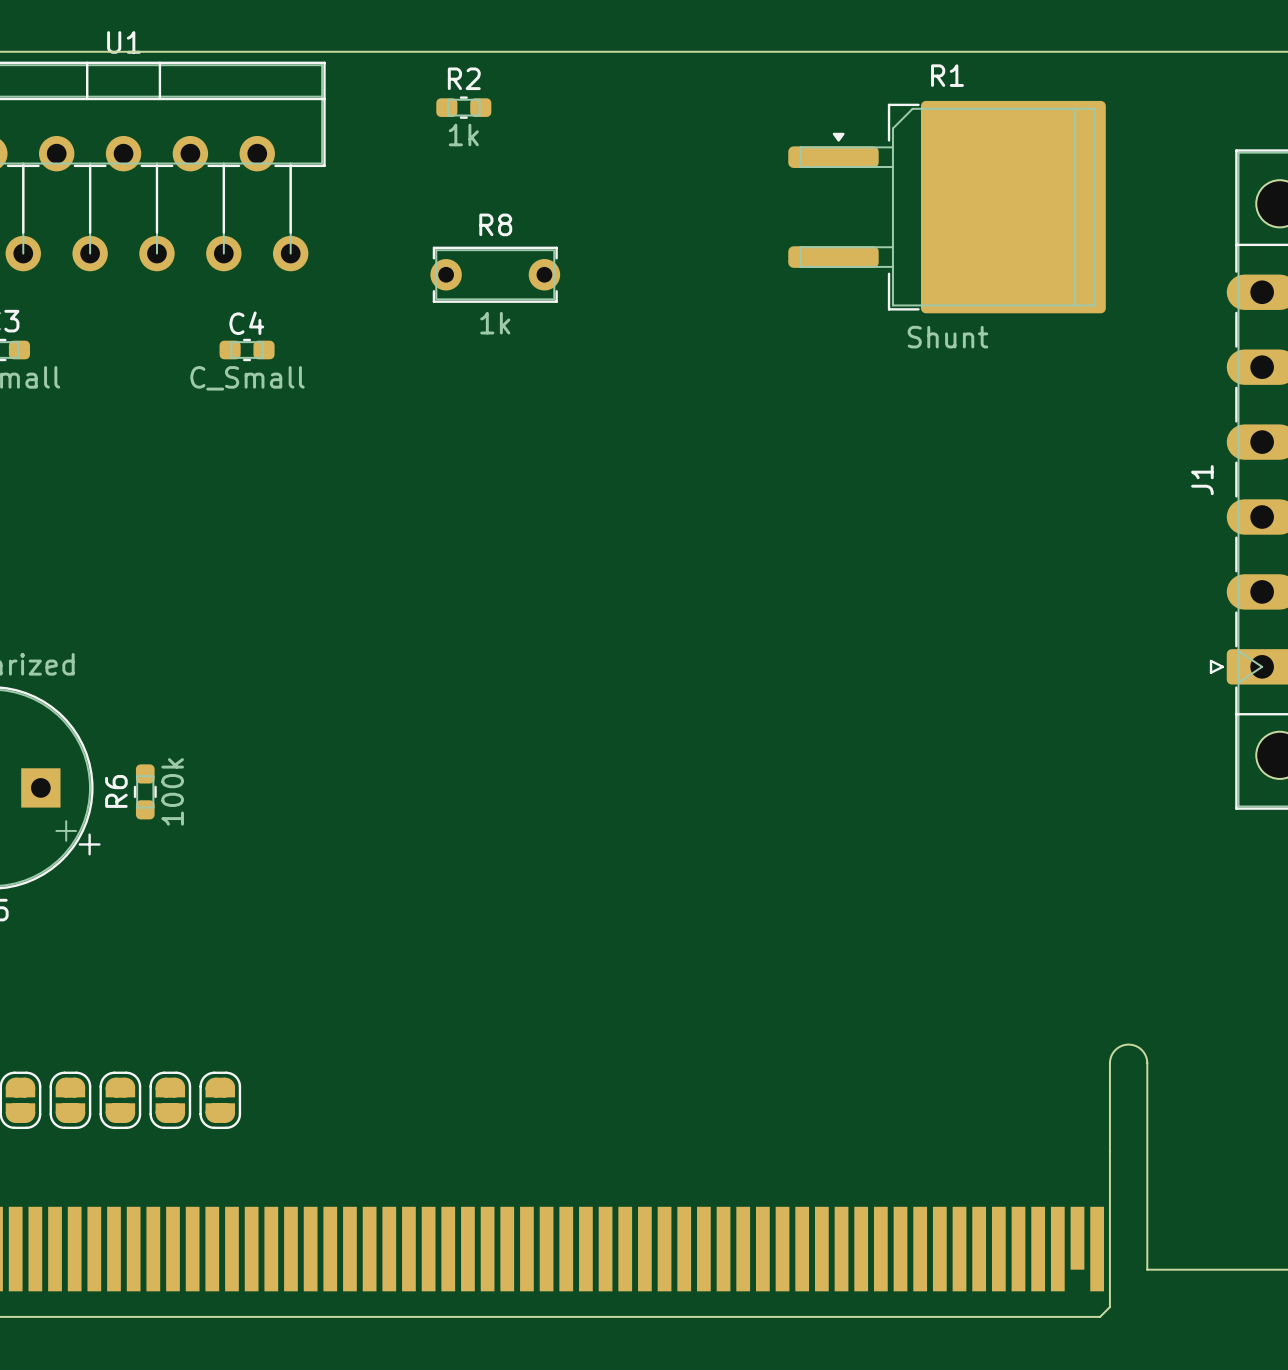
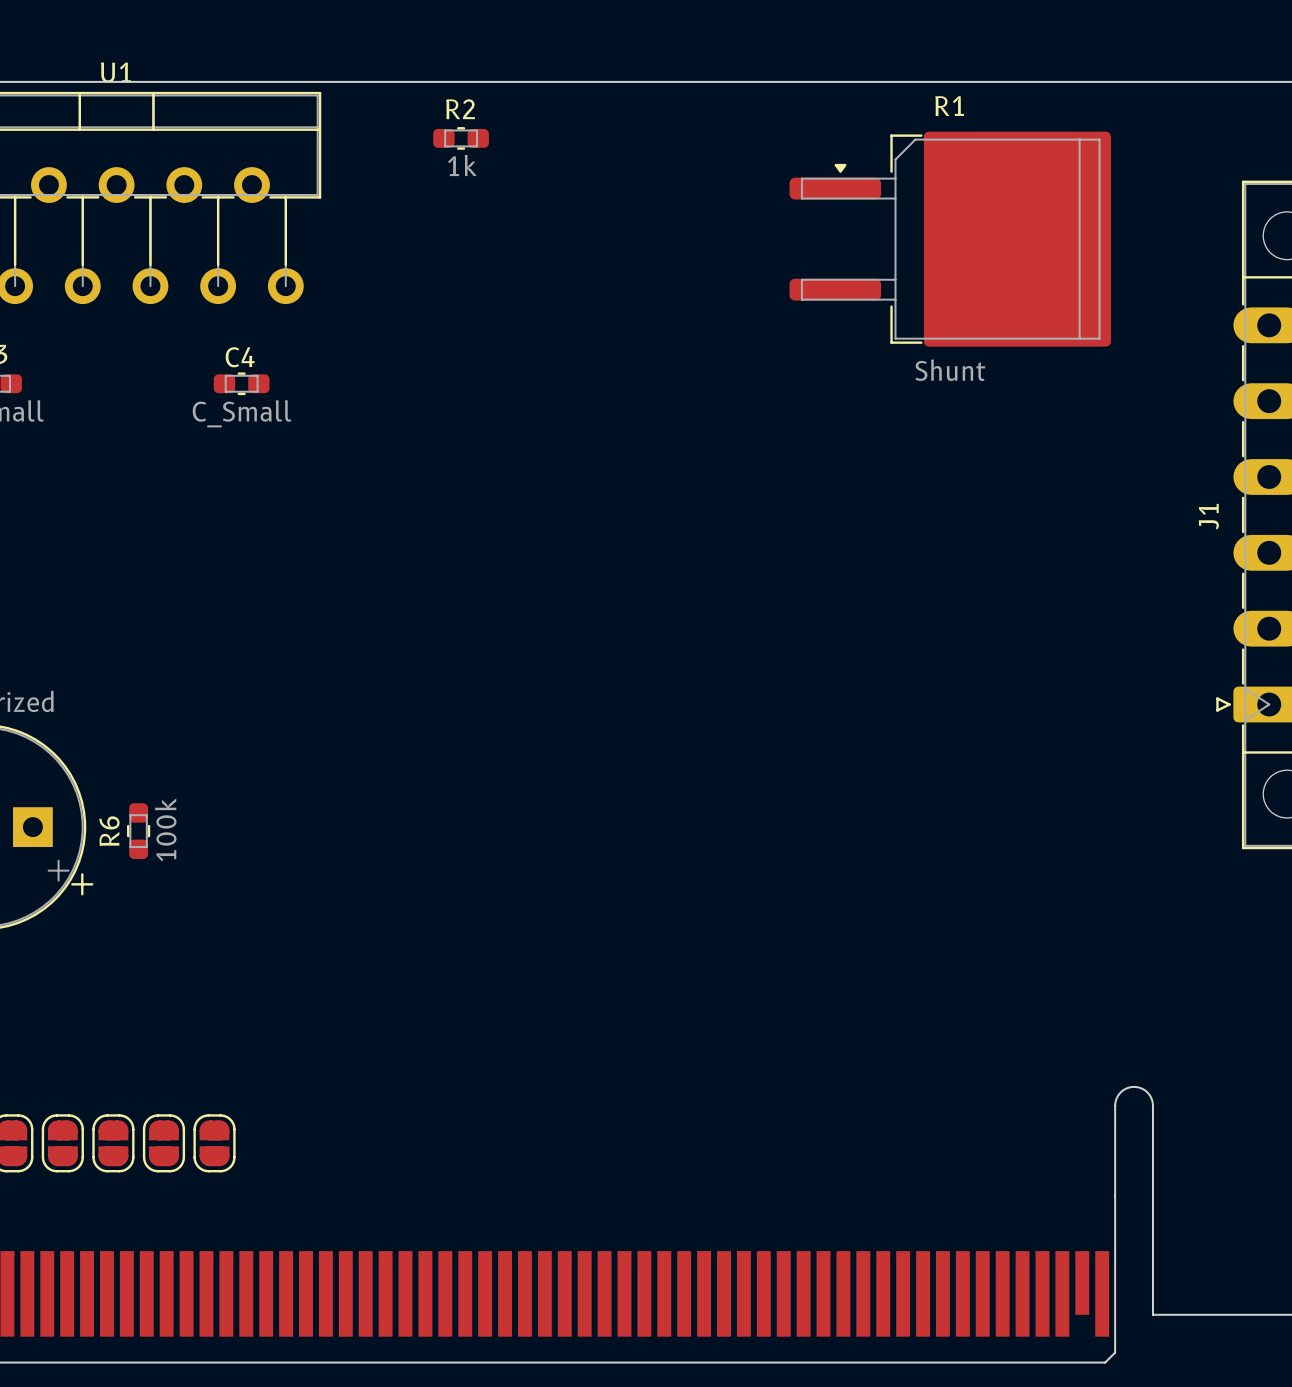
R8: 1k (495, 274) -> none

